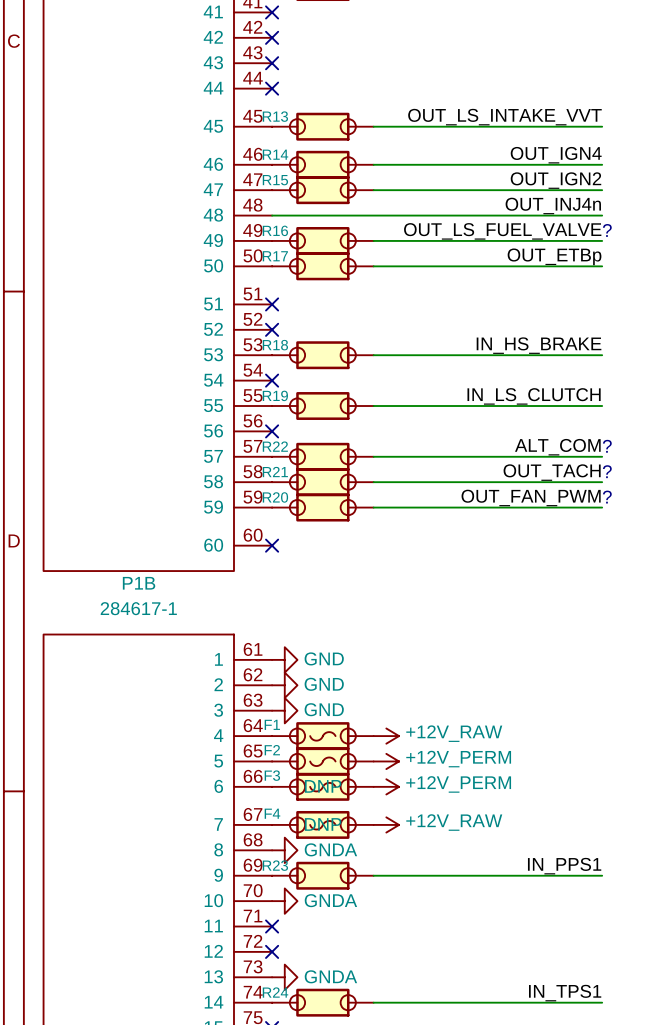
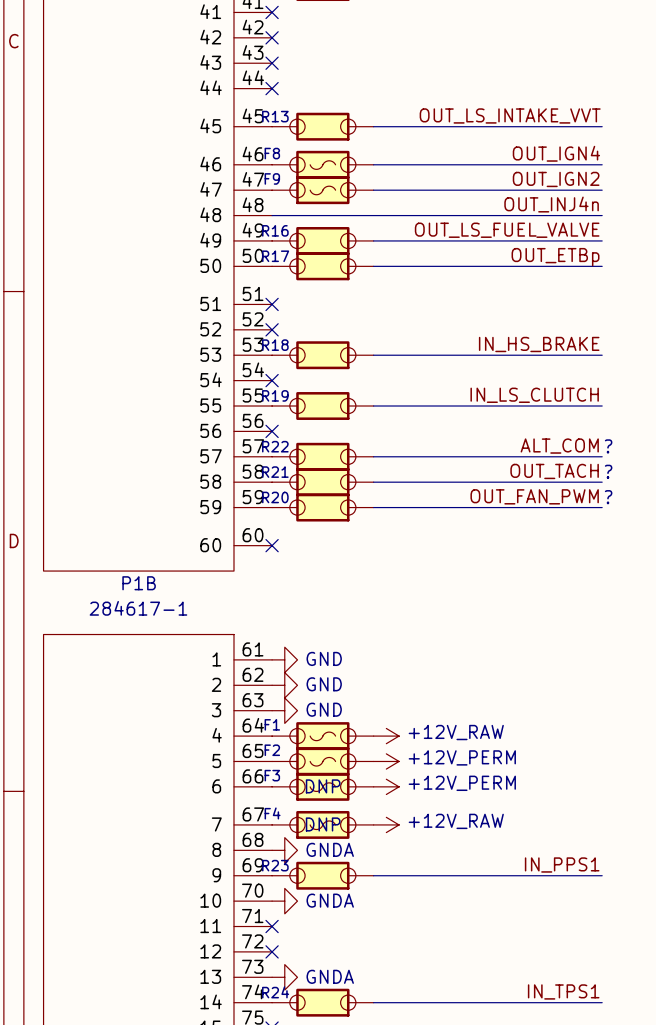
R14: (322, 164) -> none
F8: none -> (322, 164)
R15: (322, 190) -> none
F9: none -> (322, 190)
text: ? (607, 230) -> none

